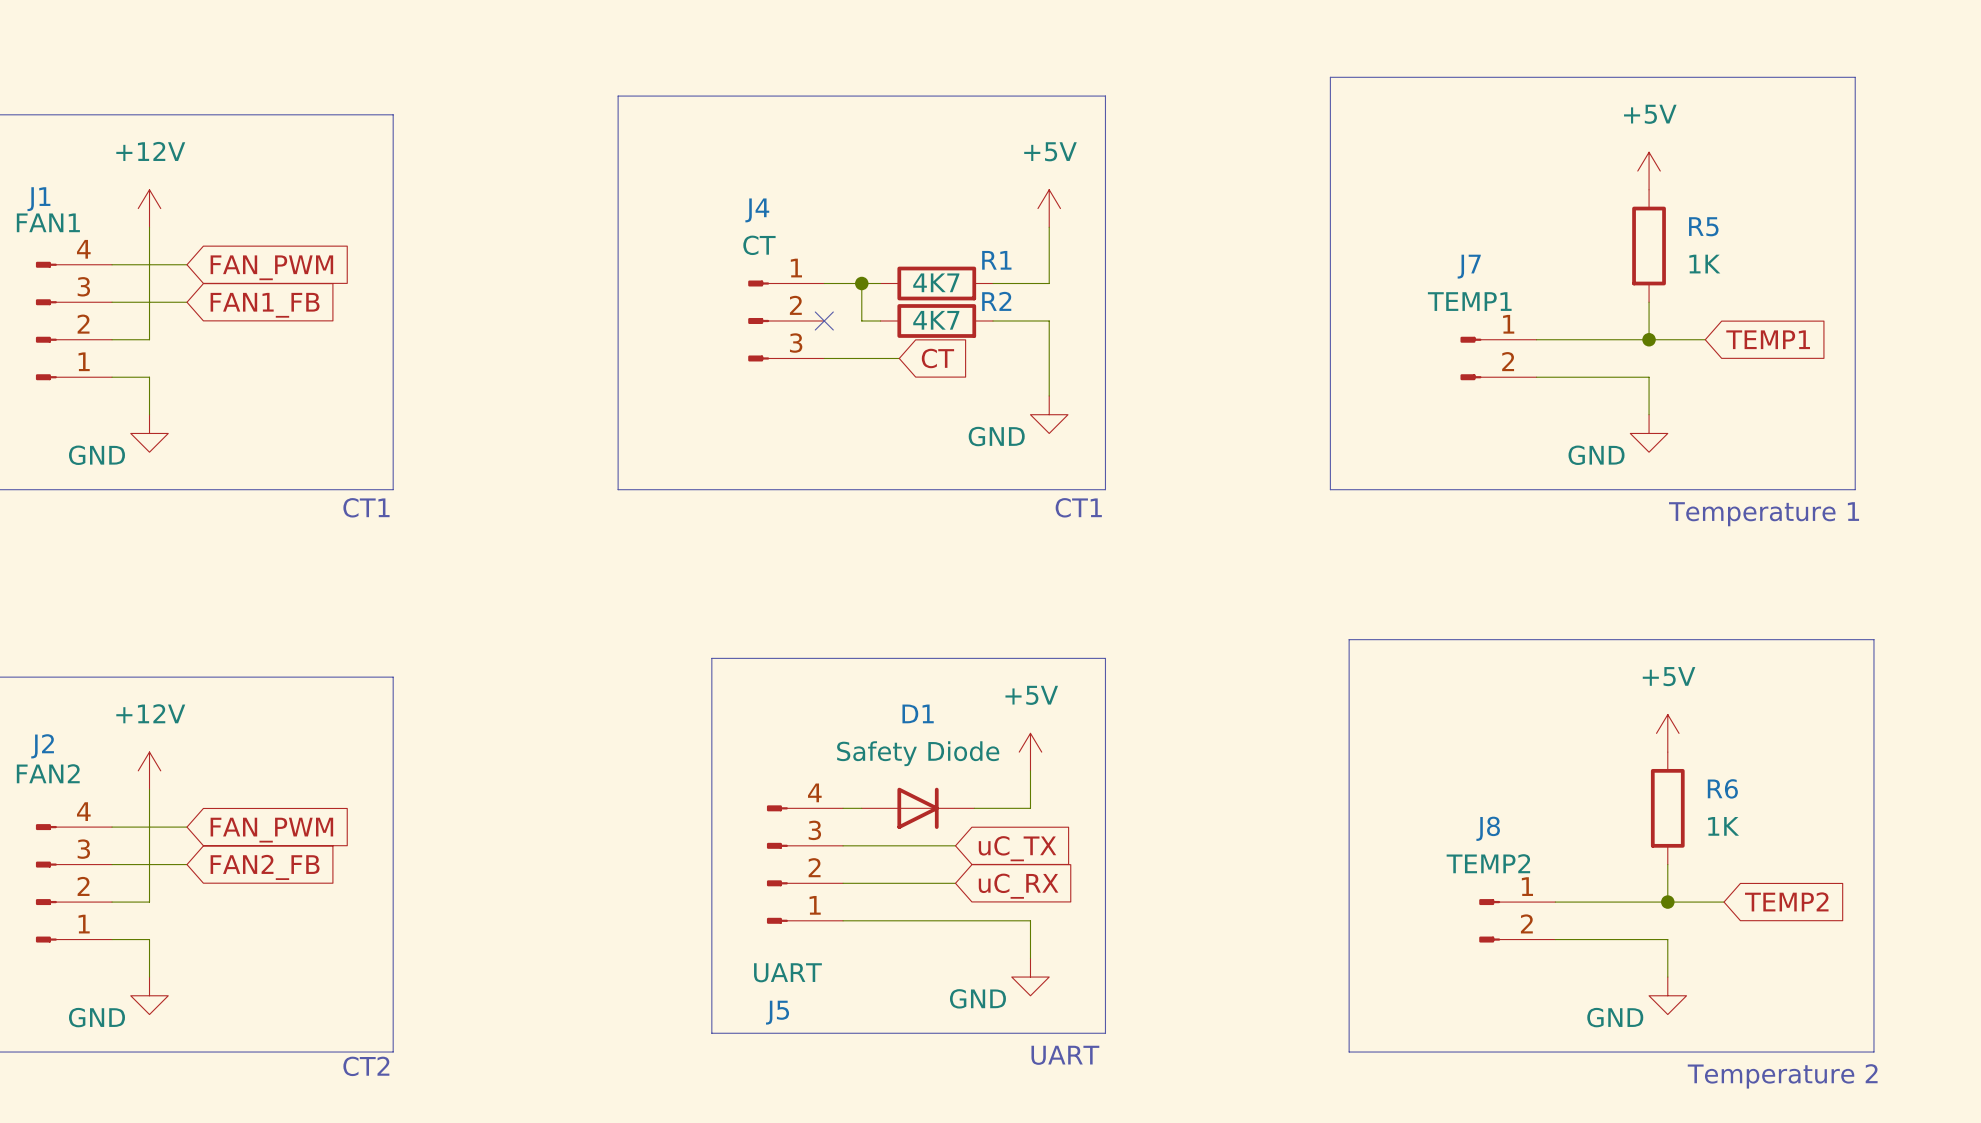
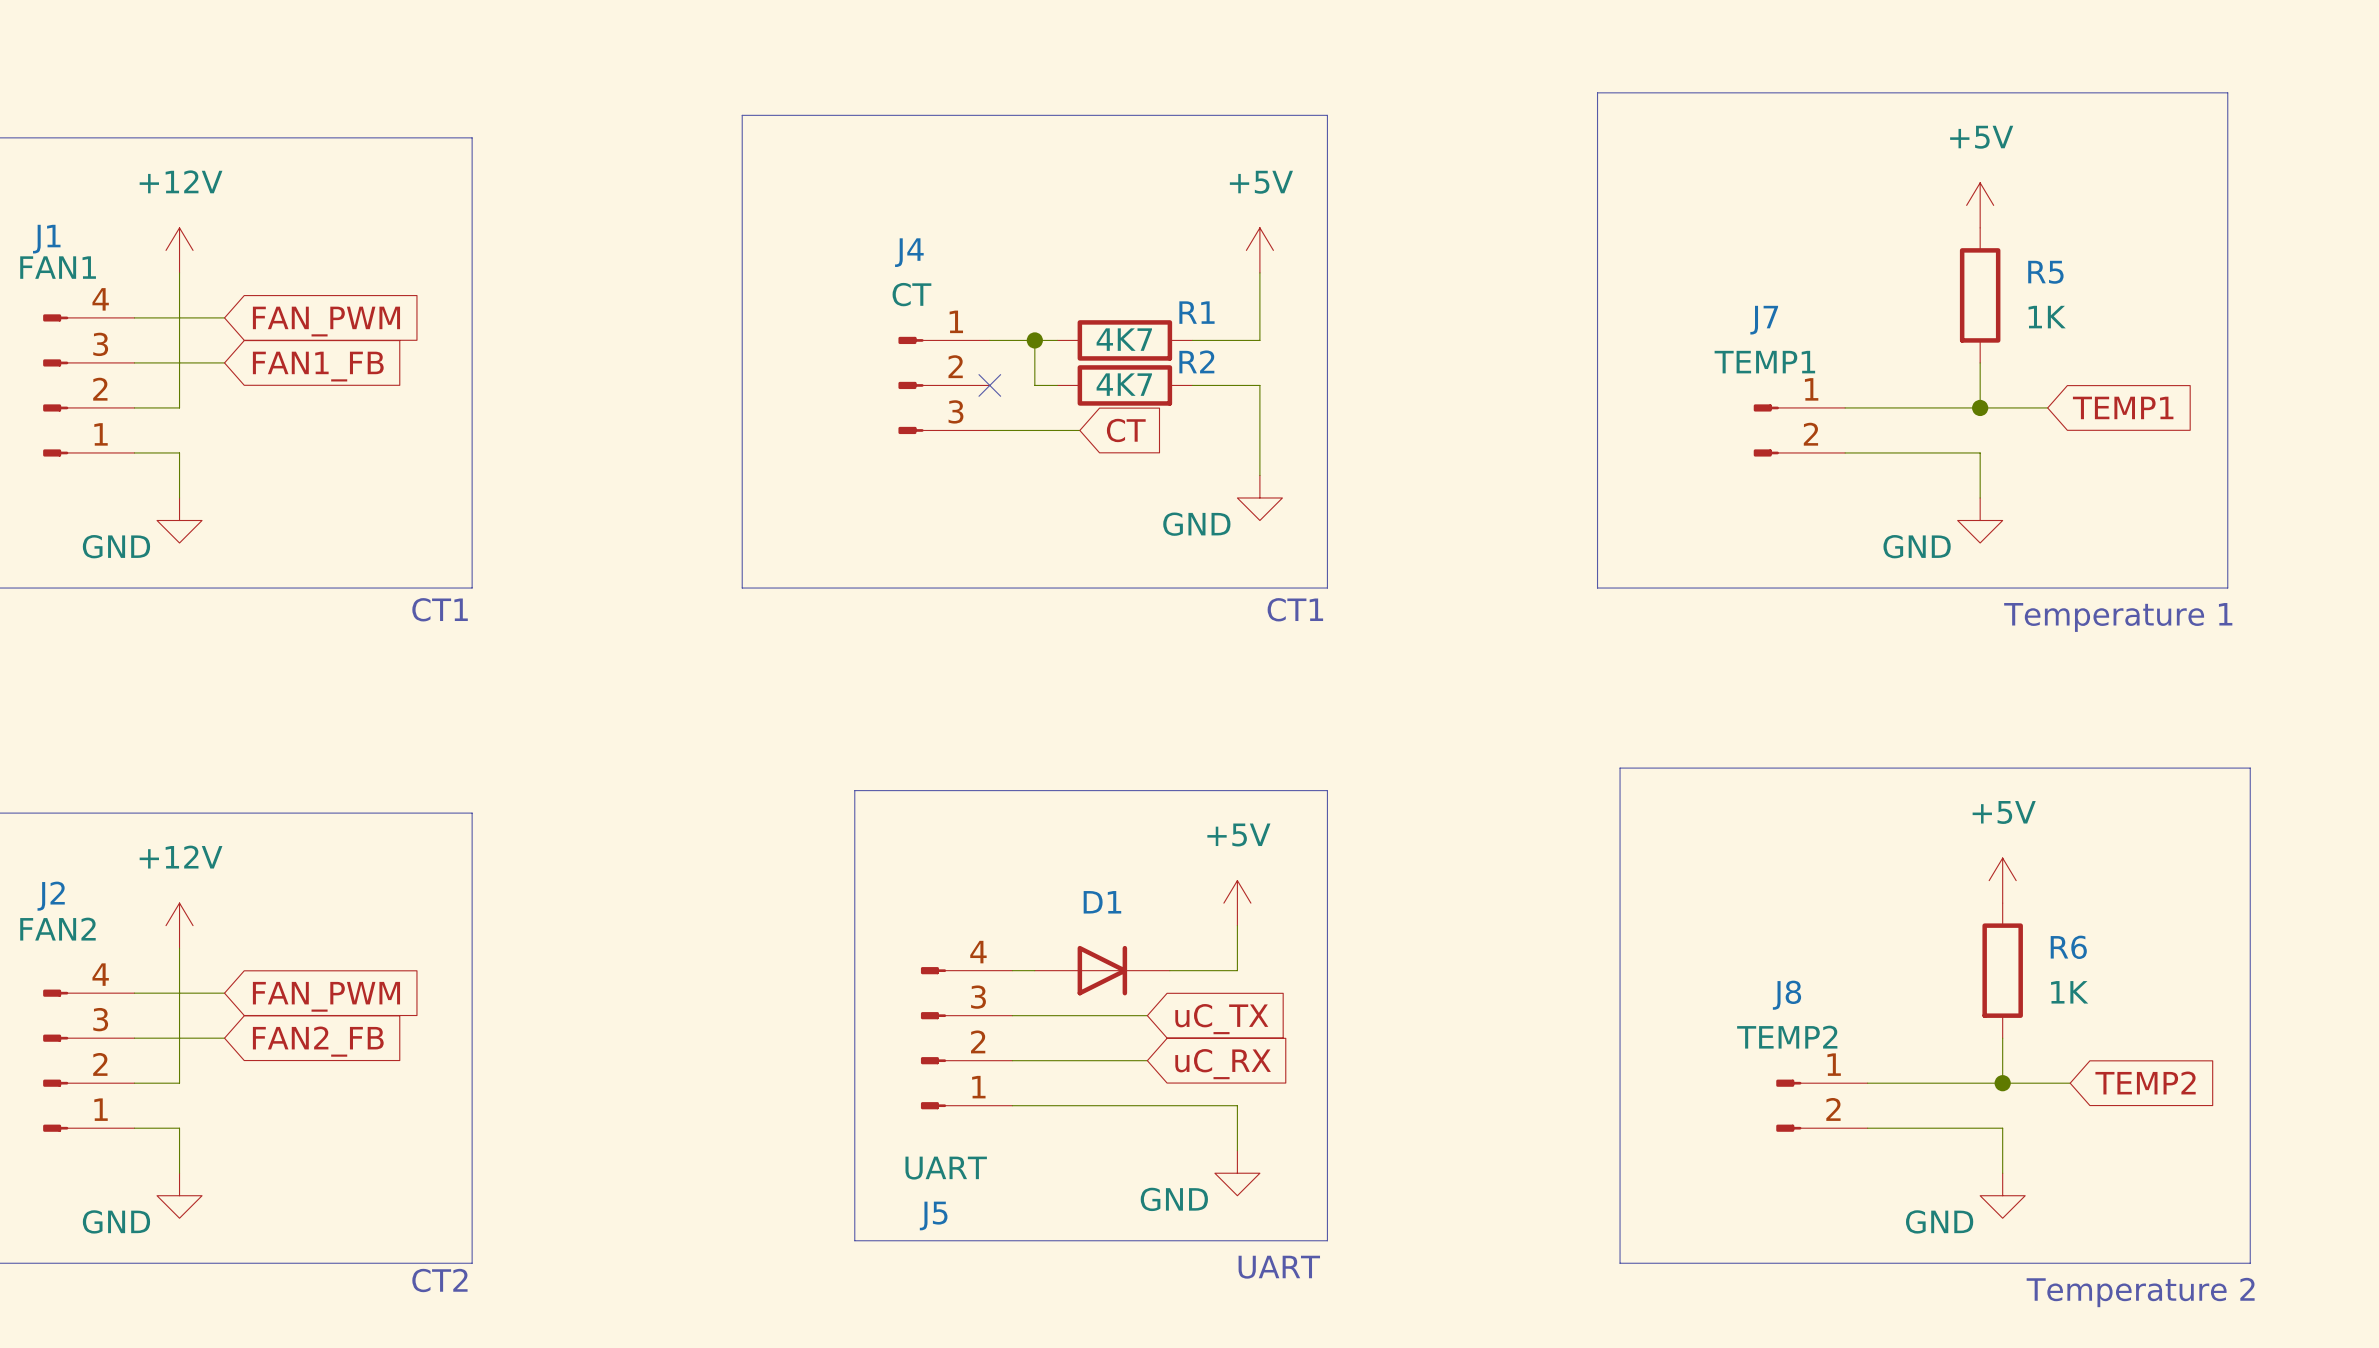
D1 name position: D1 (918, 713) -> D1 (1102, 902)
D1 value: Safety Diode (918, 753) -> none

